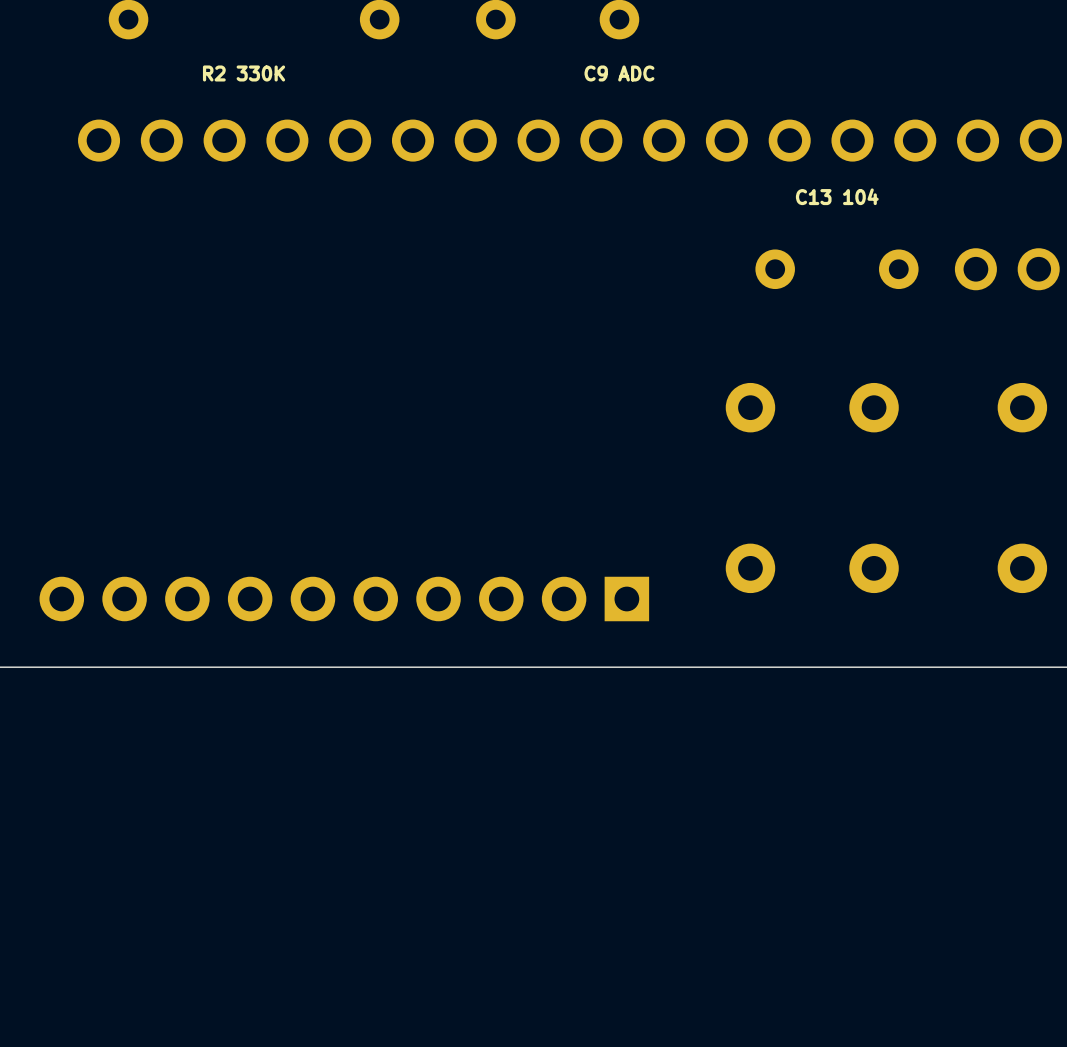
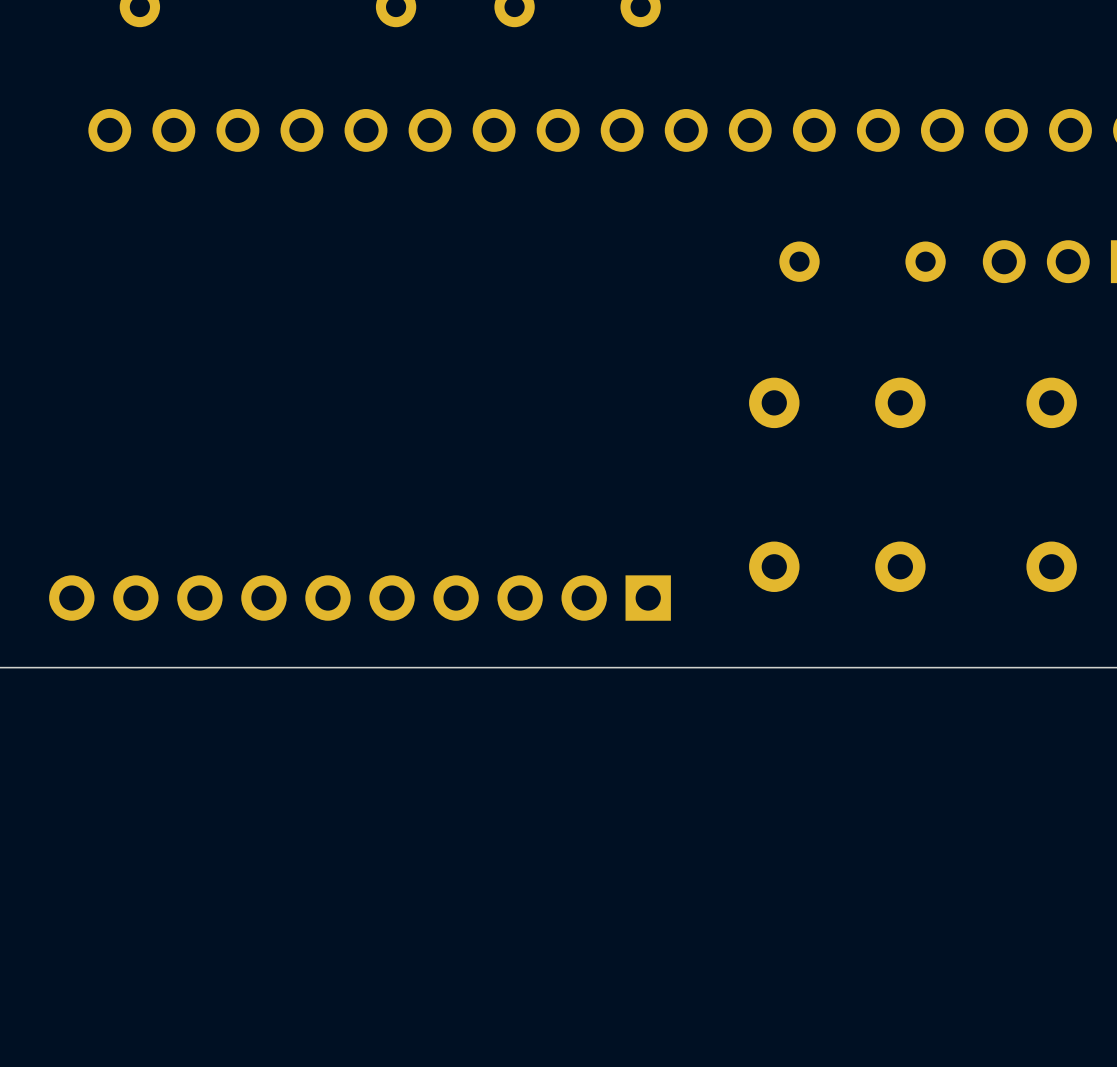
text: R2 330K (244, 73) -> none
text: C9 ADC (619, 73) -> none
text: C13 104 (837, 196) -> none

